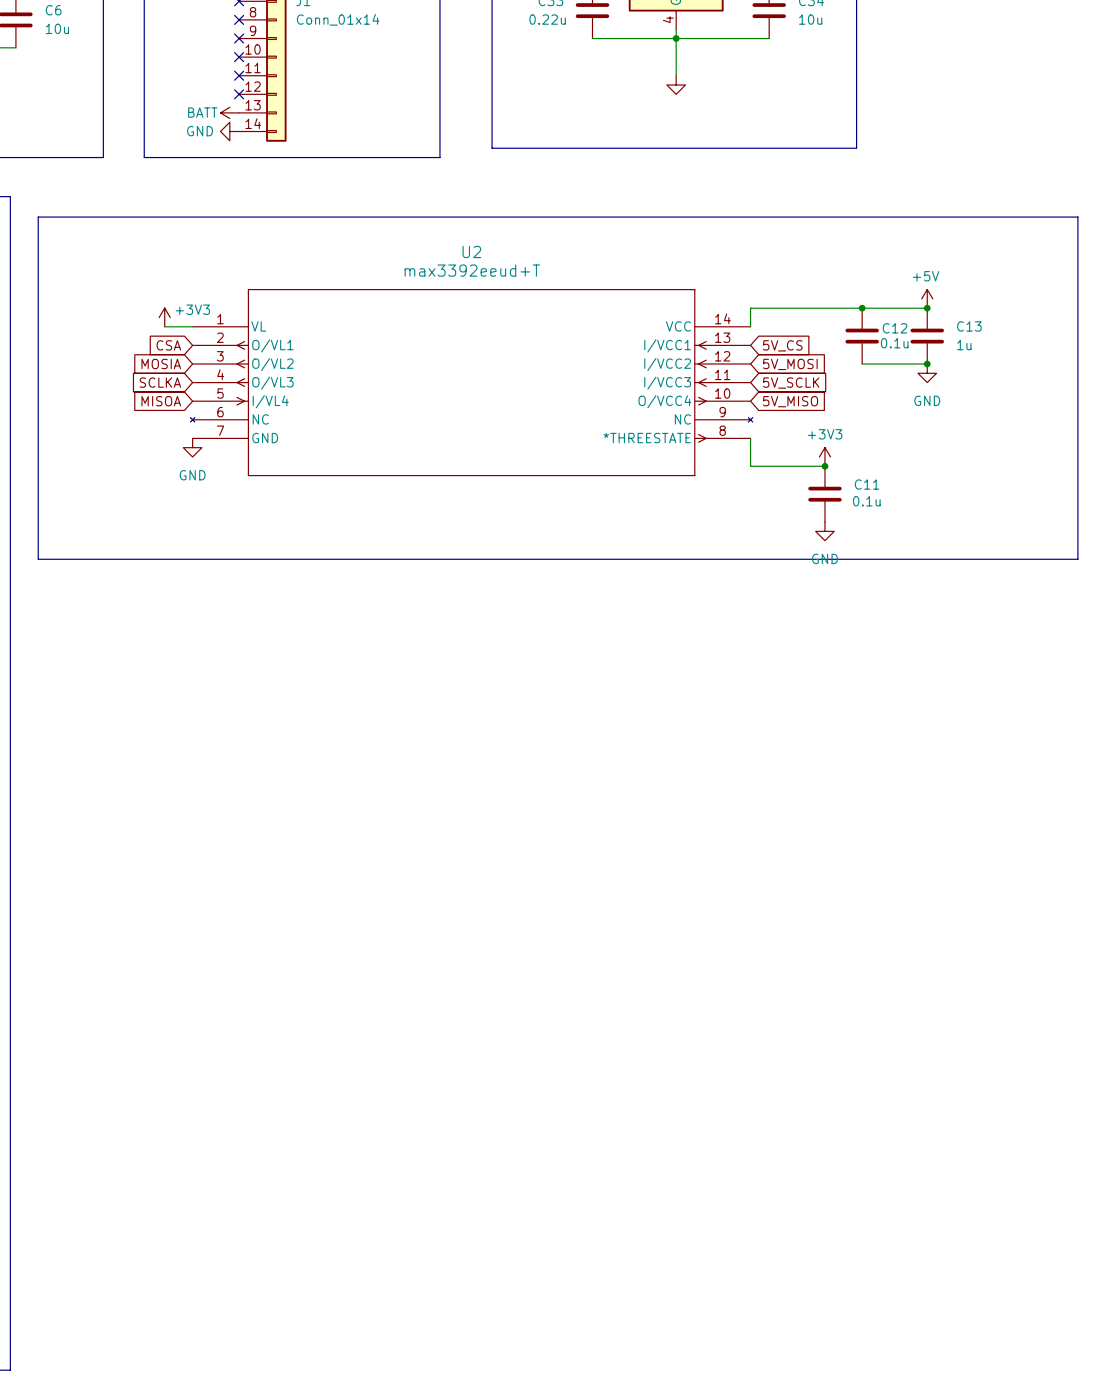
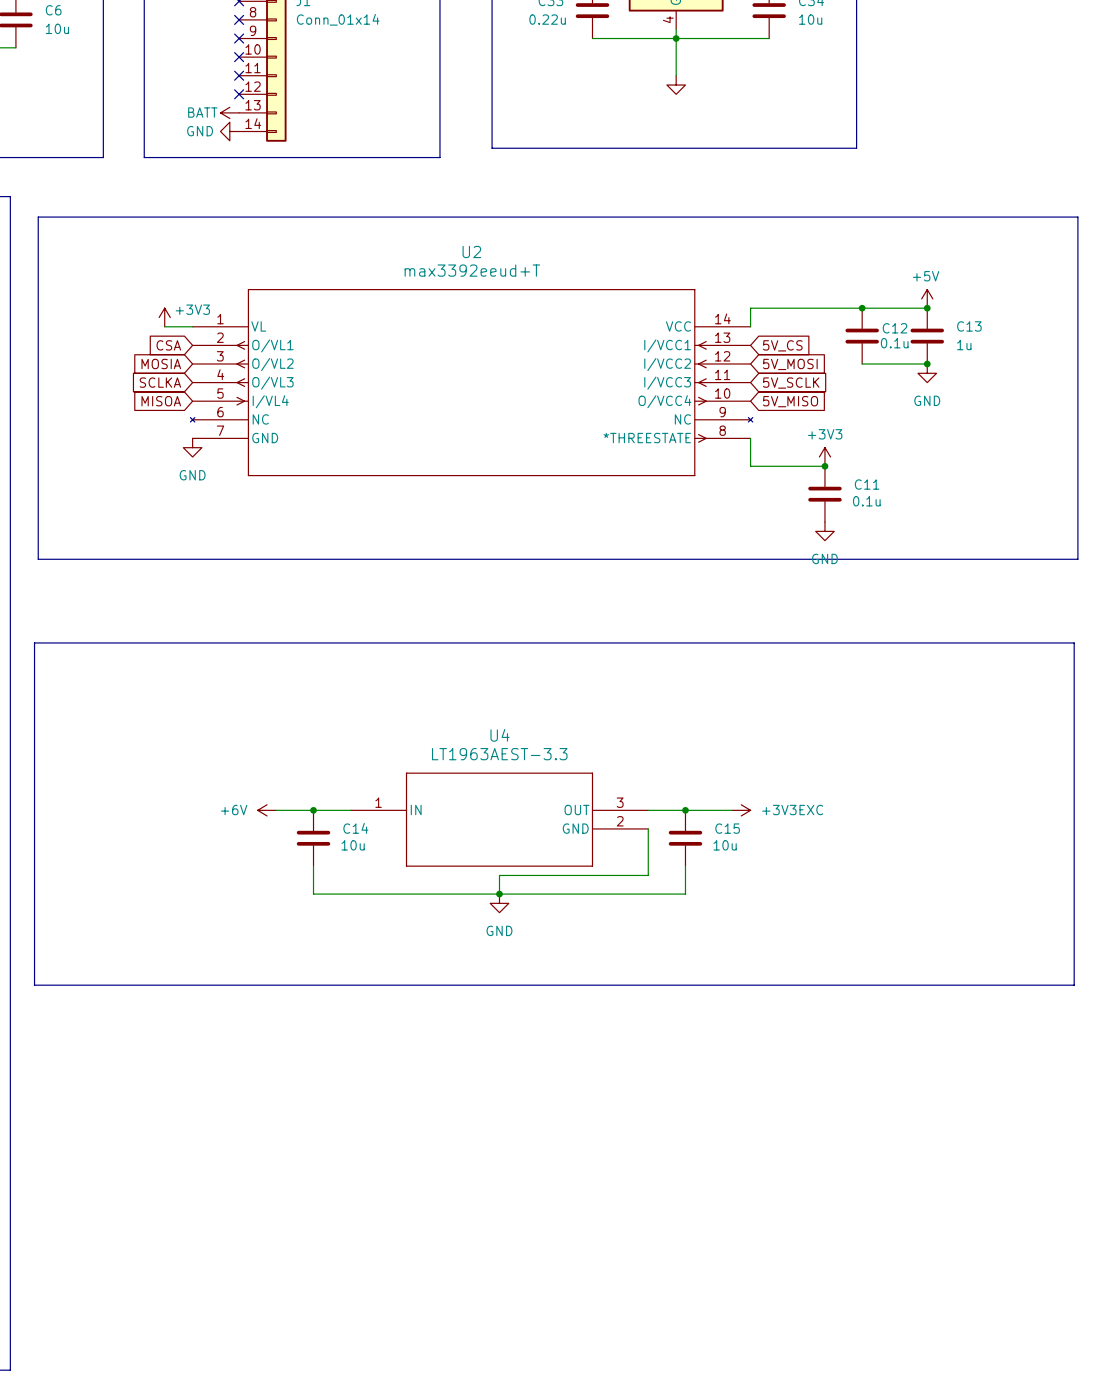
line: none -> (34, 642) (1074, 642) (1074, 985) (34, 985) (34, 642)
power symbol: none -> +6V (267, 810)
wire: none -> (276, 810) (350, 810)
junction: none -> (313, 810)
wire: none -> (648, 810) (731, 810)
junction: none -> (685, 810)
power symbol: none -> +3V3EXC (741, 810)
U4: none -> LT1963AEST-3.3 (499, 819)
wire: none -> (648, 828) (648, 875) (499, 875) (499, 894)
C14: none -> 10u (313, 838)
C15: none -> 10u (685, 838)
wire: none -> (313, 866) (313, 894) (685, 894) (685, 866)
junction: none -> (499, 894)
power symbol: none -> GND (499, 903)

